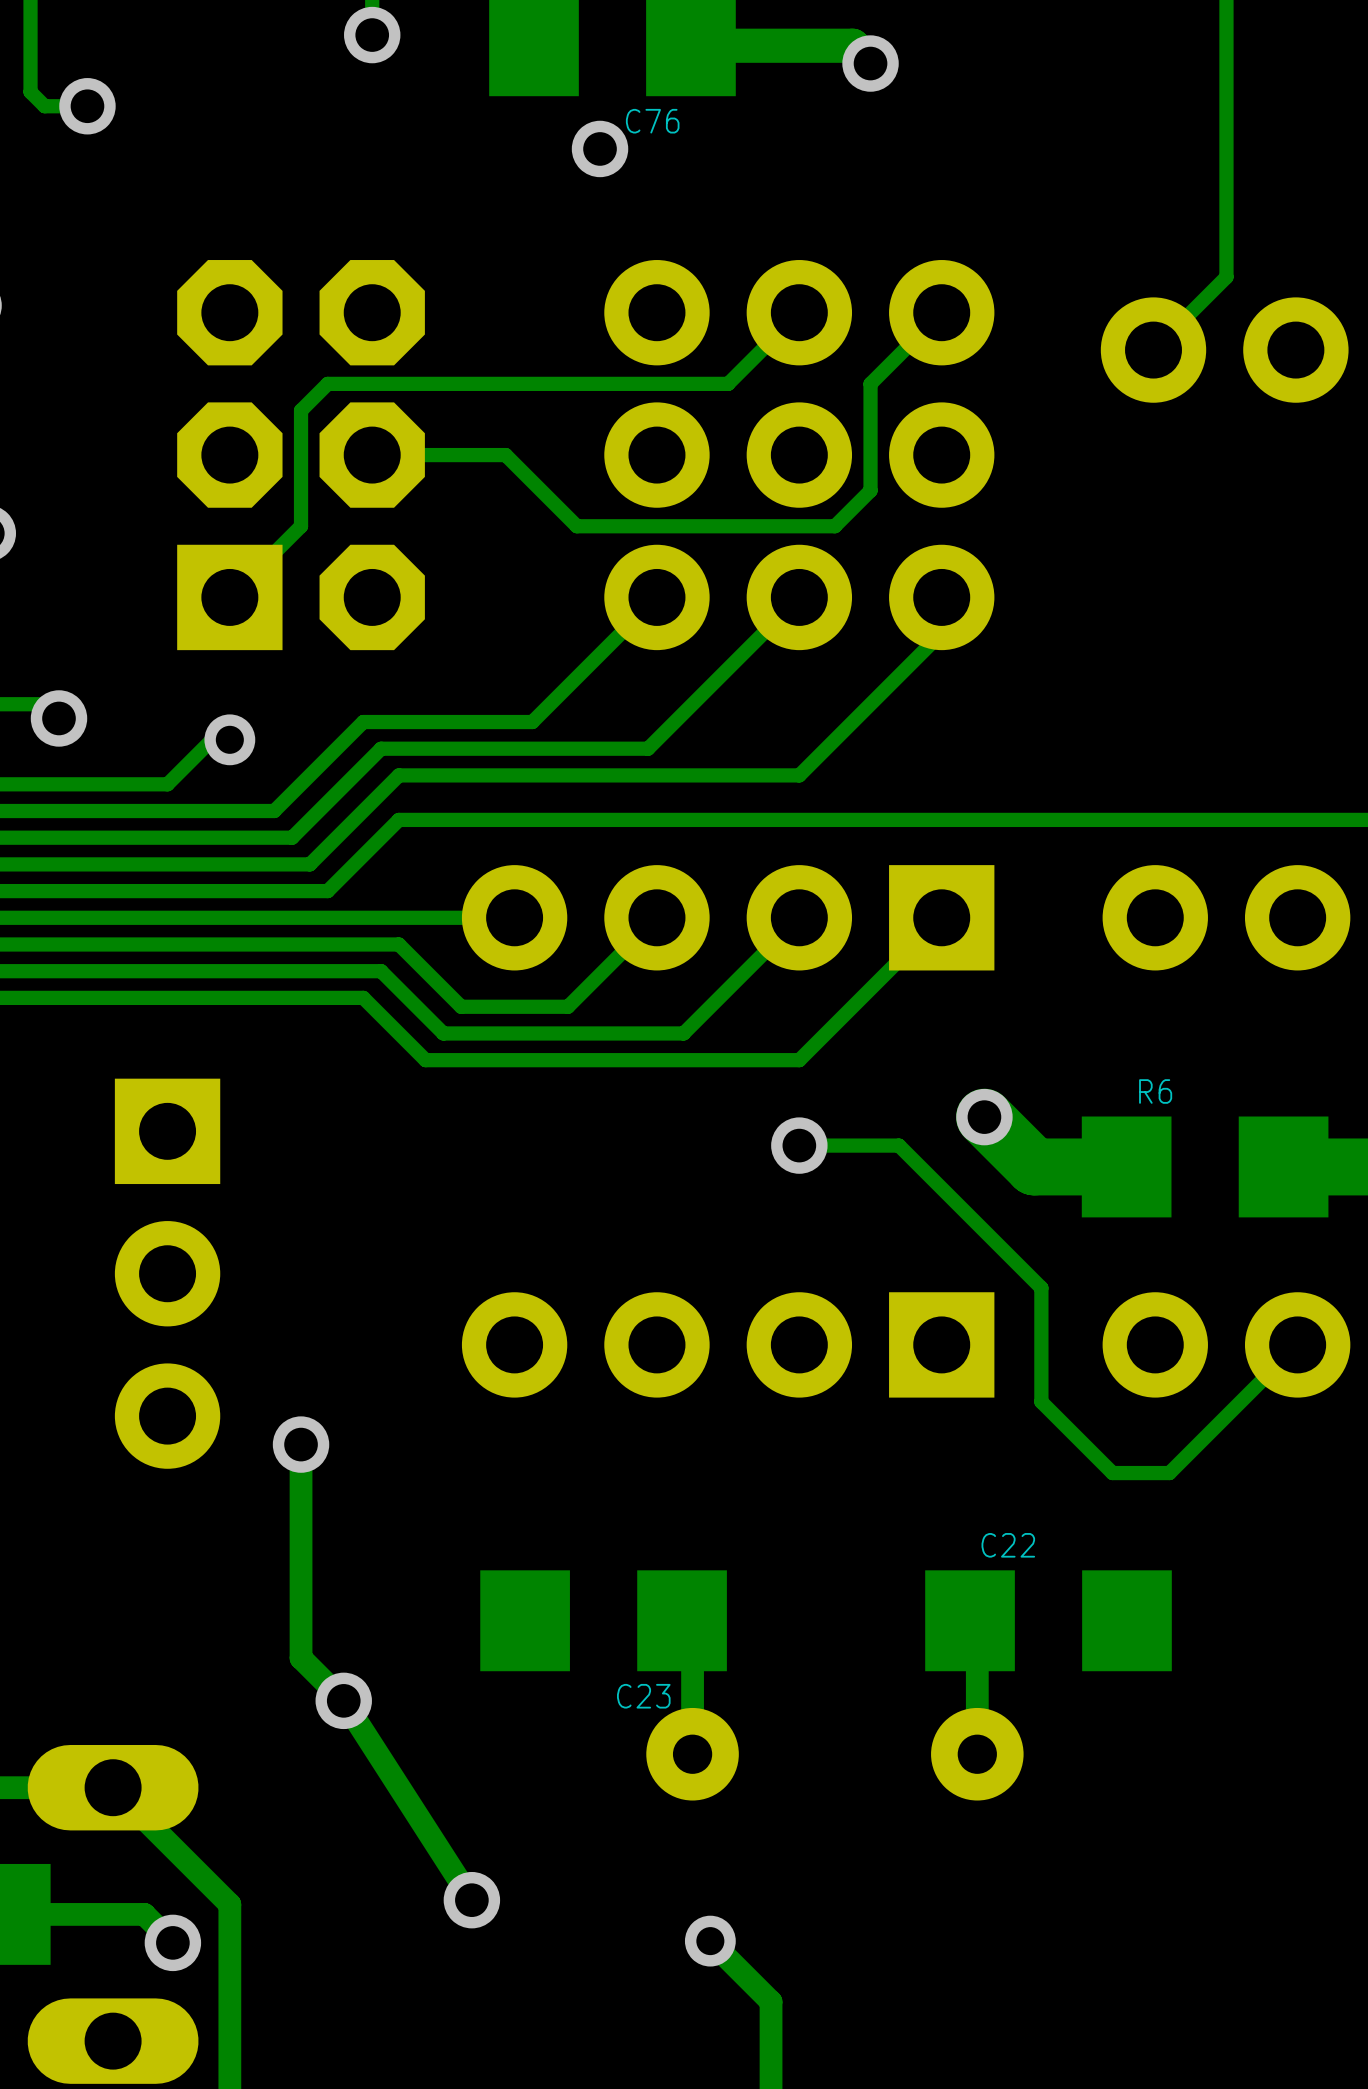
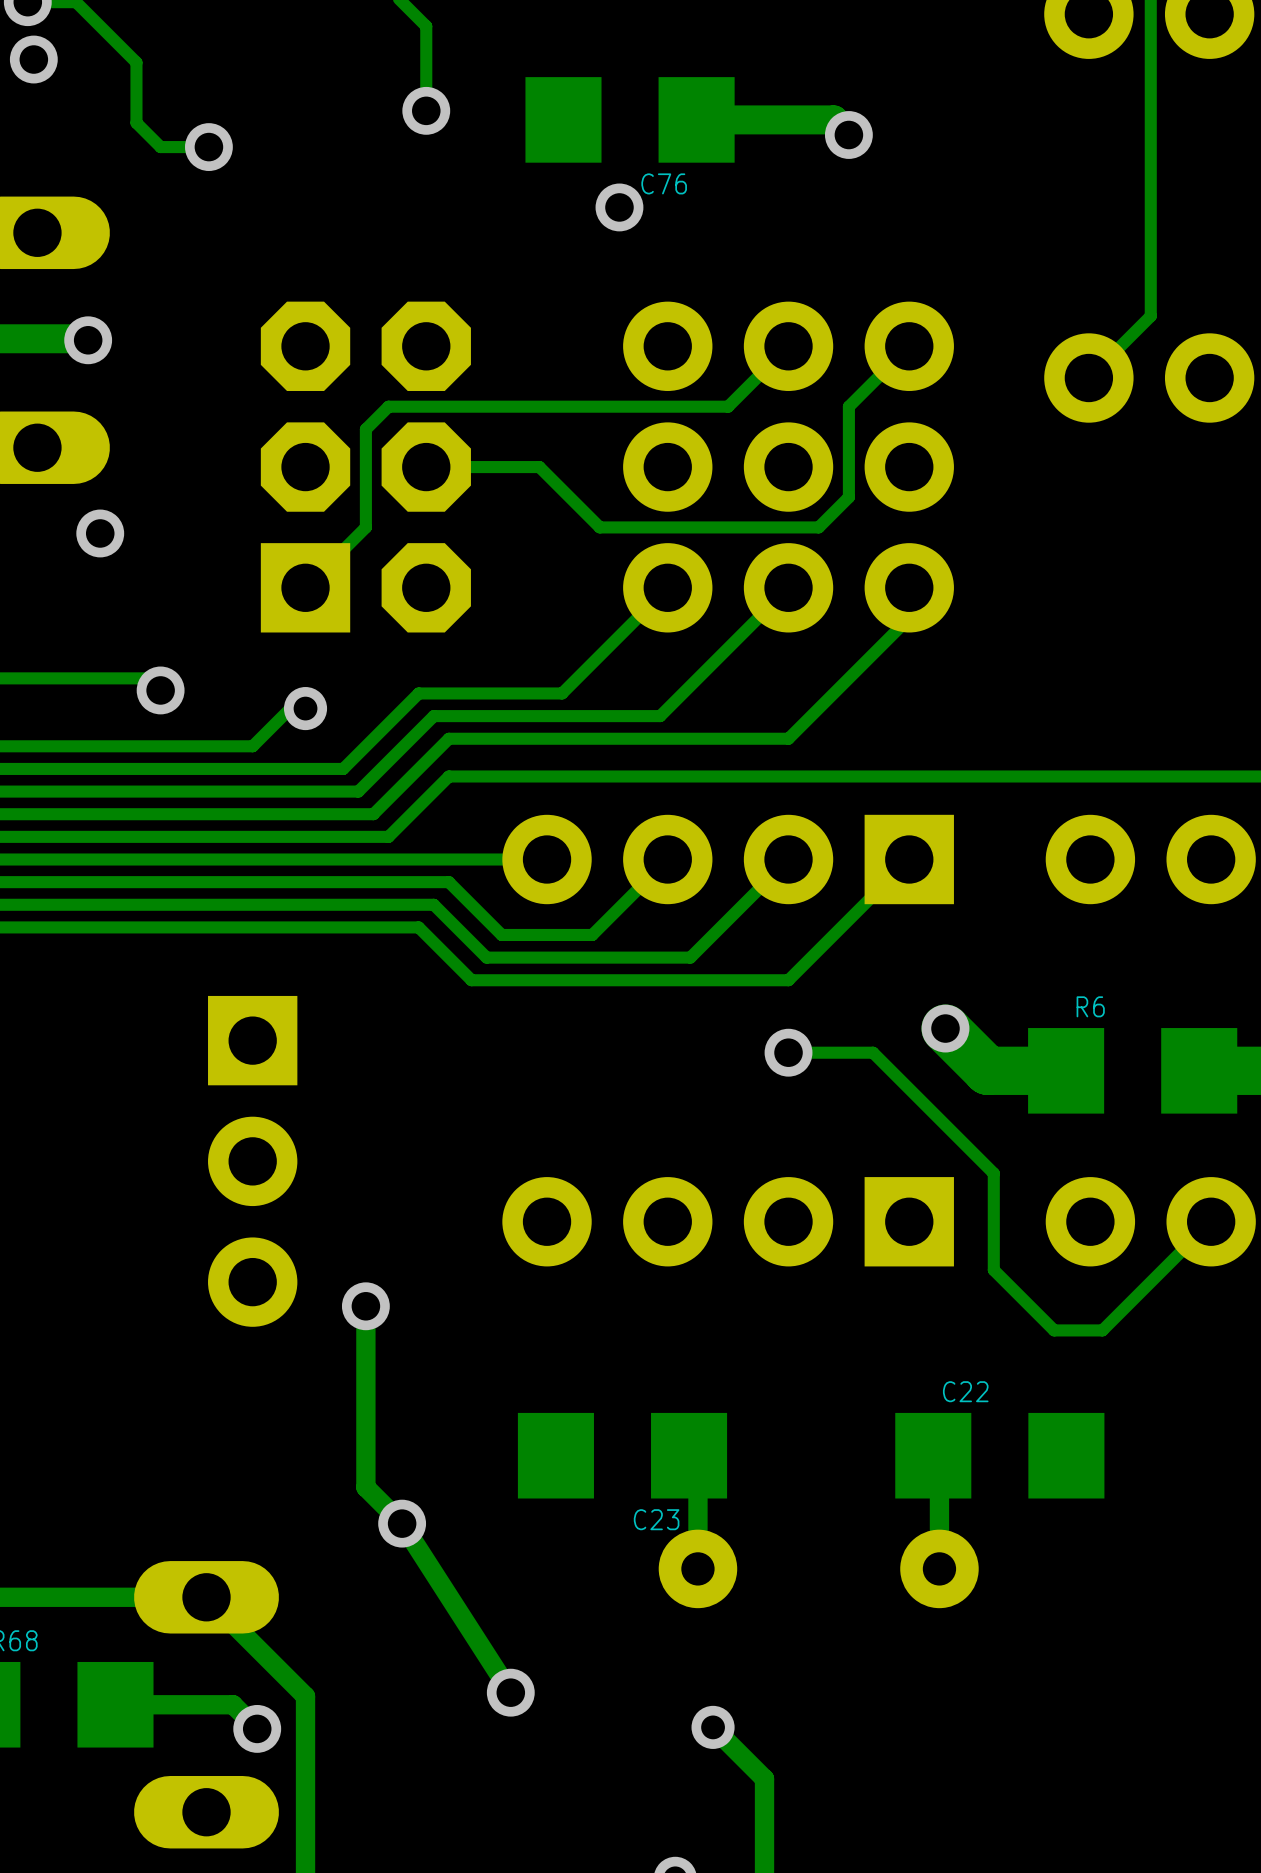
track: (30, 49) (30, 92) (44, 106) (87, 106) -> (136, 122) (160, 147) (208, 147)
via position: (87, 106) -> (208, 147)

